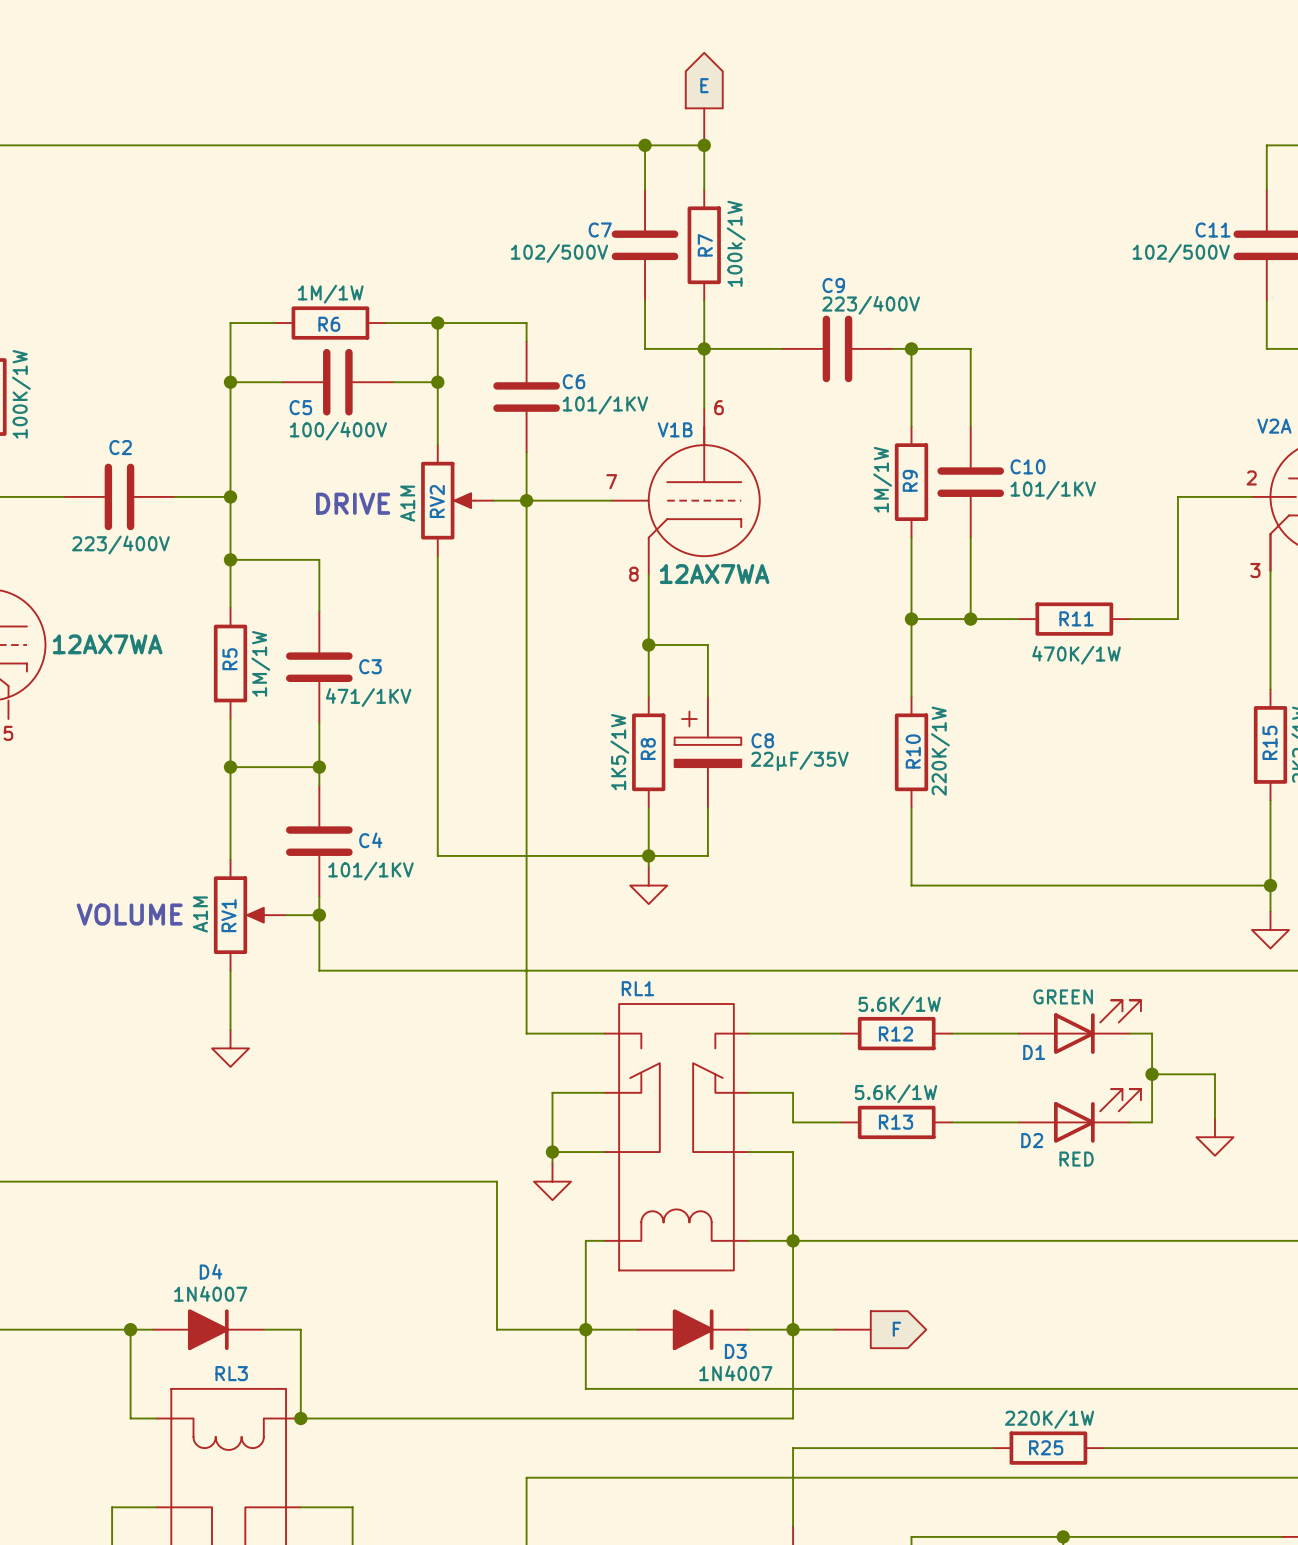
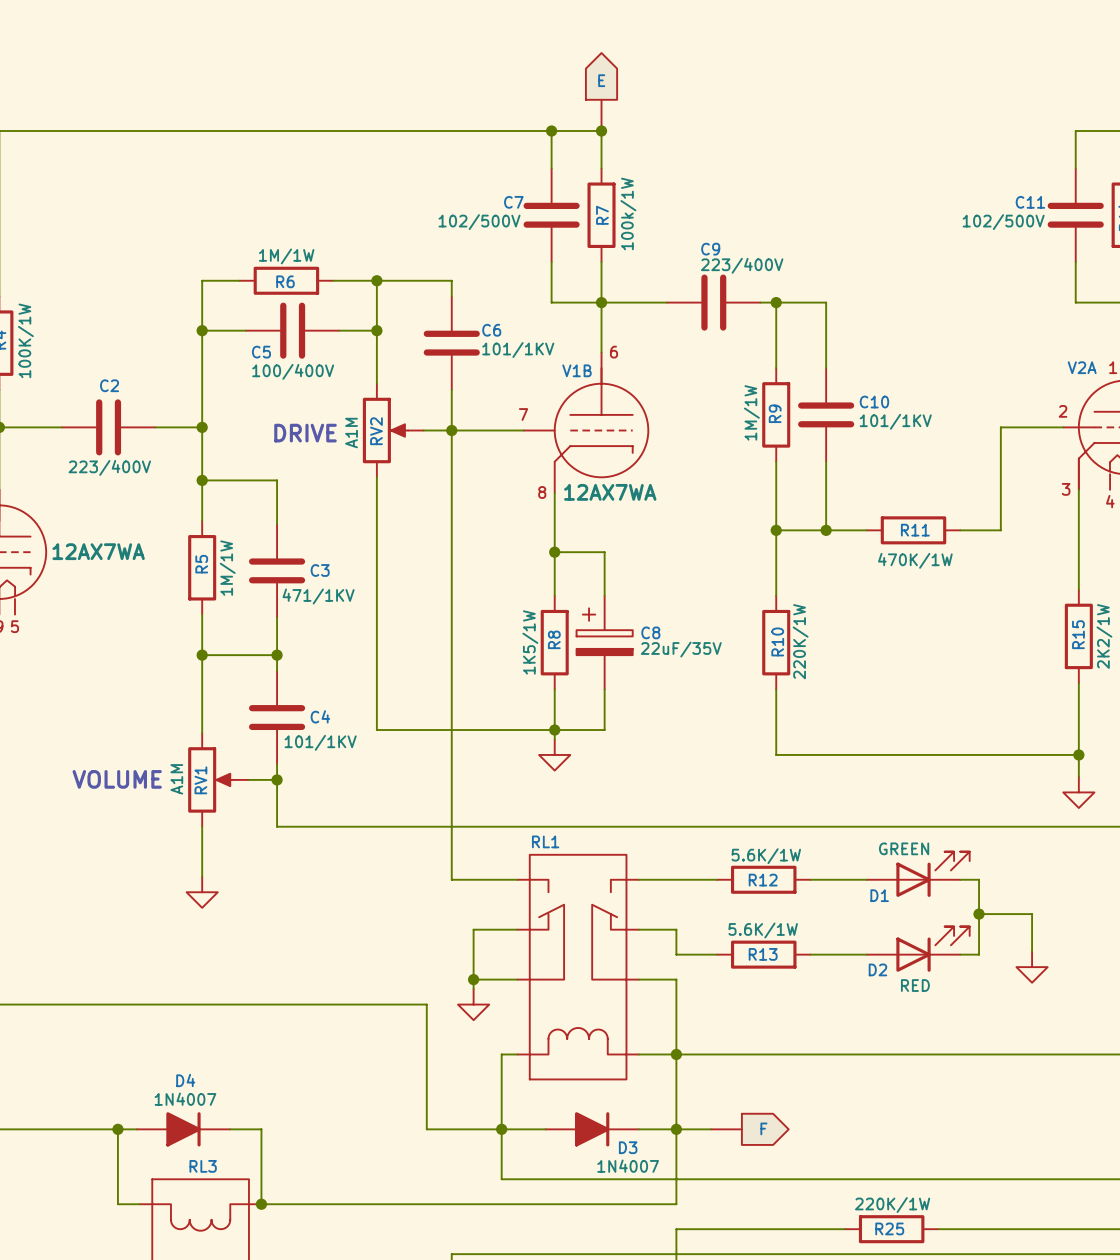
C8 value: 22µF/35V (799, 761) -> 22uF/35V (681, 649)

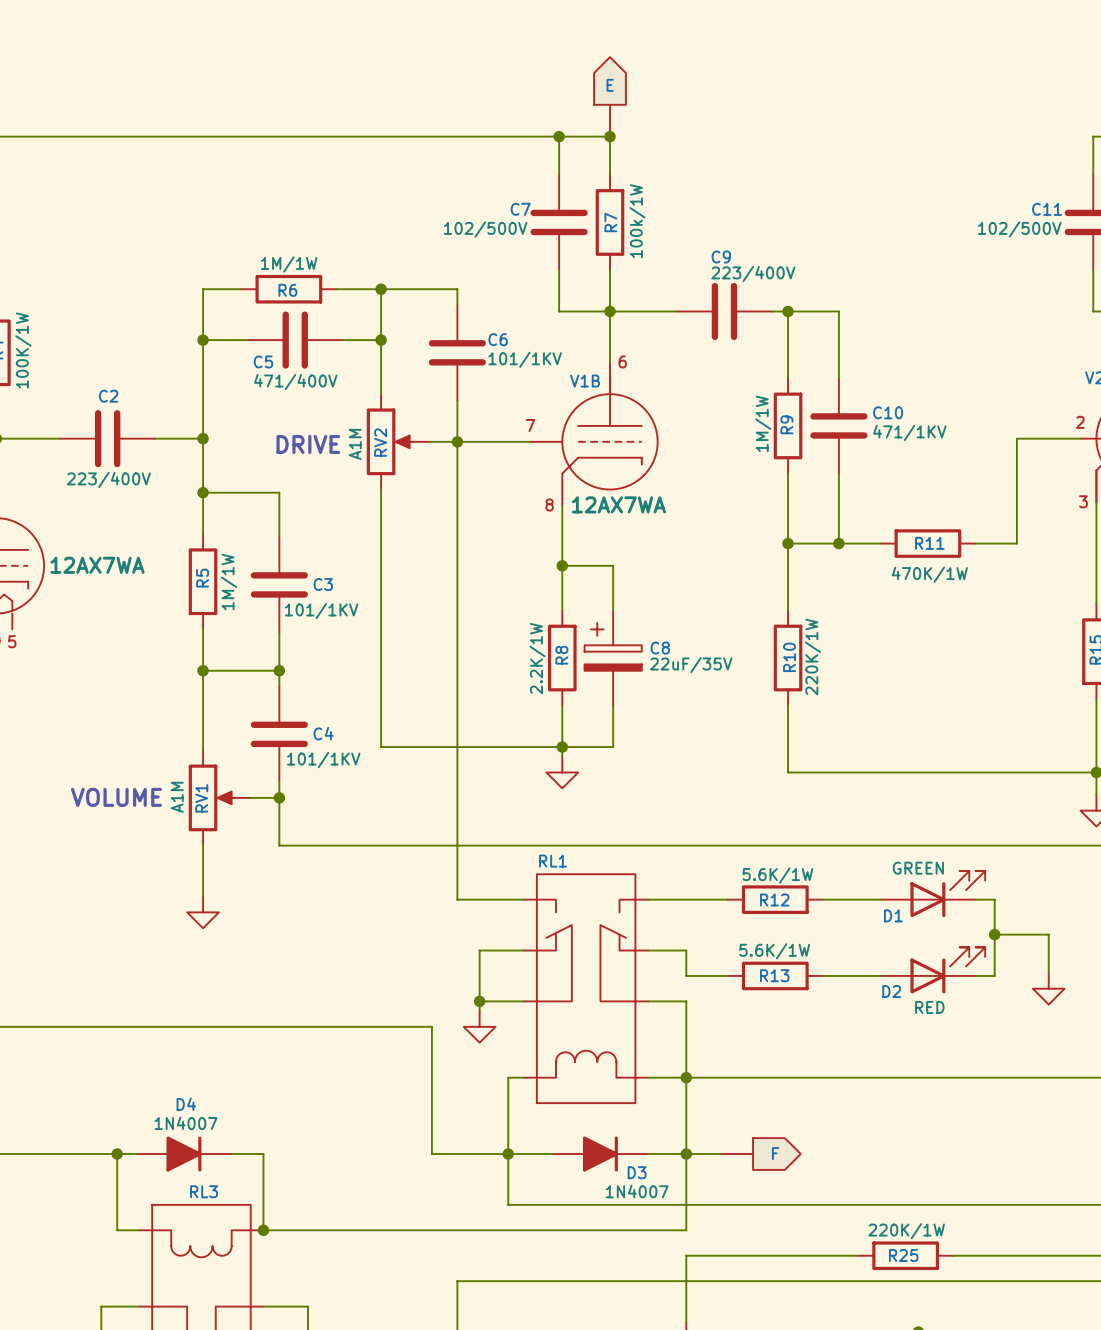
C5 value: 100/400V (293, 371) -> 471/400V (295, 382)
C10 value: 101/1KV (895, 421) -> 471/1KV (909, 432)
C3 value: 471/1KV (318, 596) -> 101/1KV (321, 610)
R8 value: 1K5/1W (530, 642) -> 2.2K/1W (537, 658)

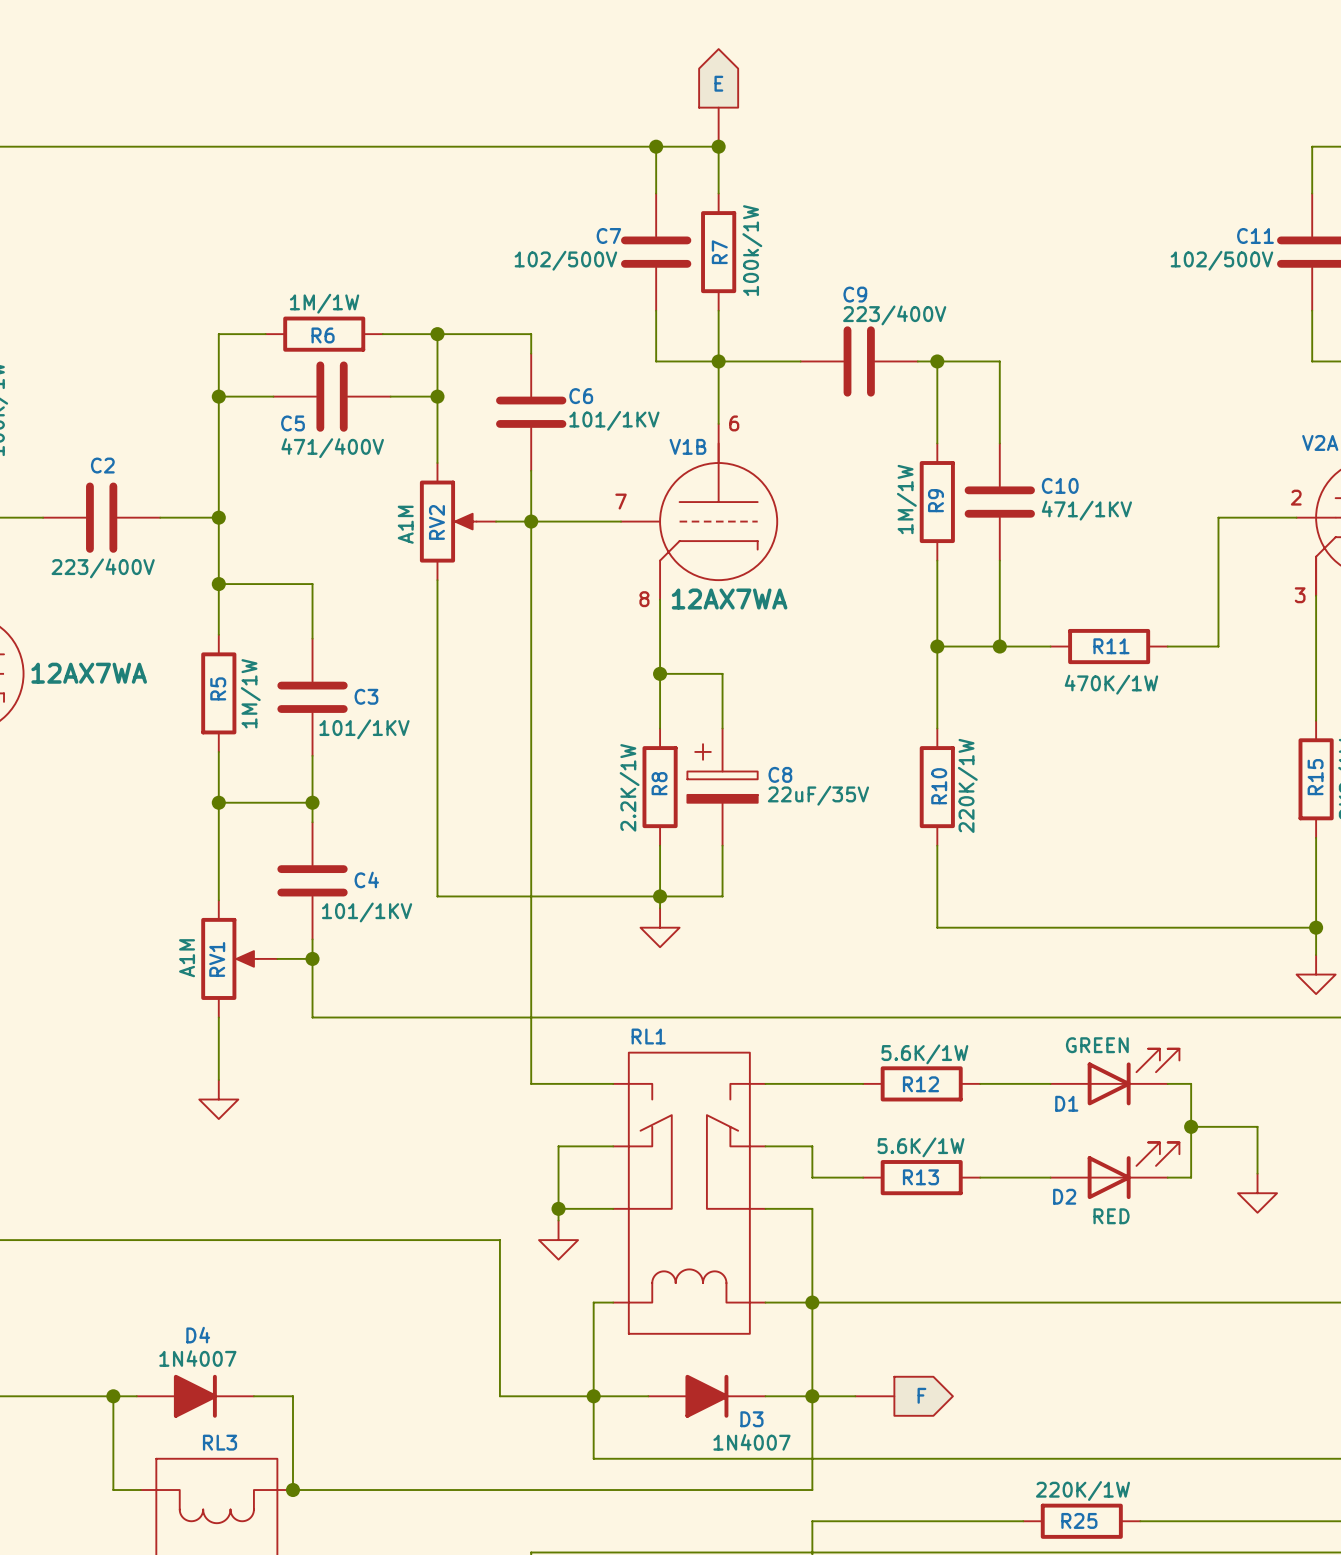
text: DRIVE (308, 444) -> none
text: VOLUME (116, 797) -> none

